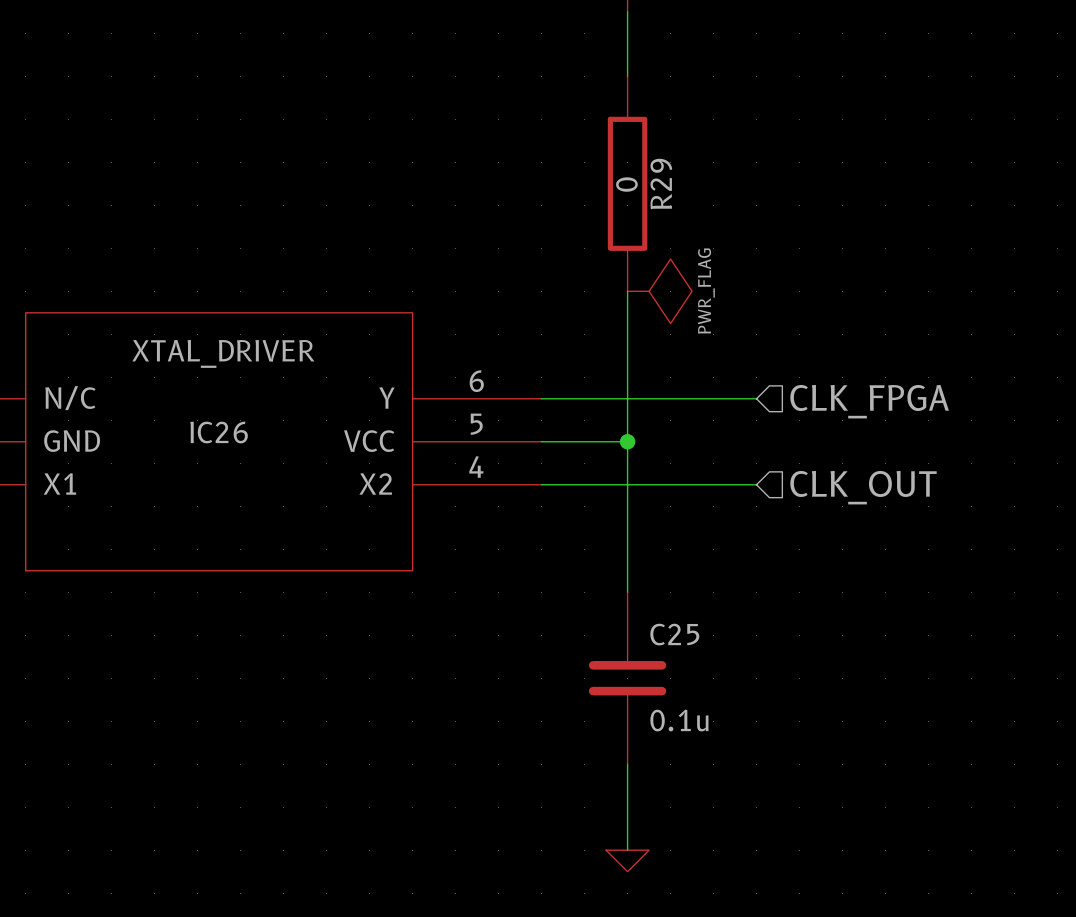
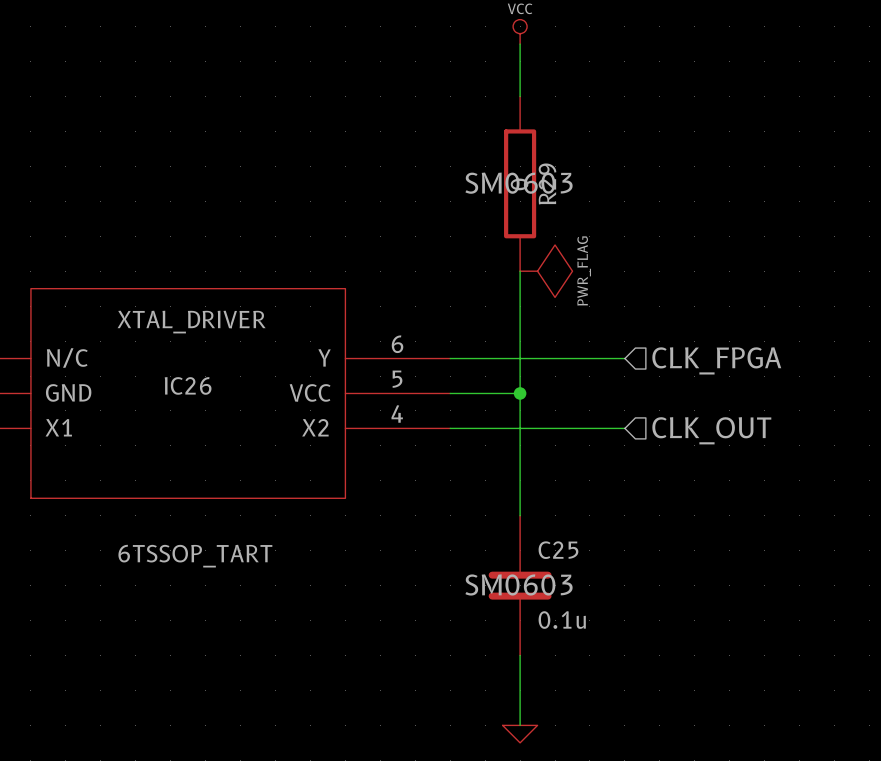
R29 text: none -> SM0603 (518, 183)
IC26 text: none -> 6TSSOP_TART (195, 556)
C25 text: none -> SM0603 (518, 584)

